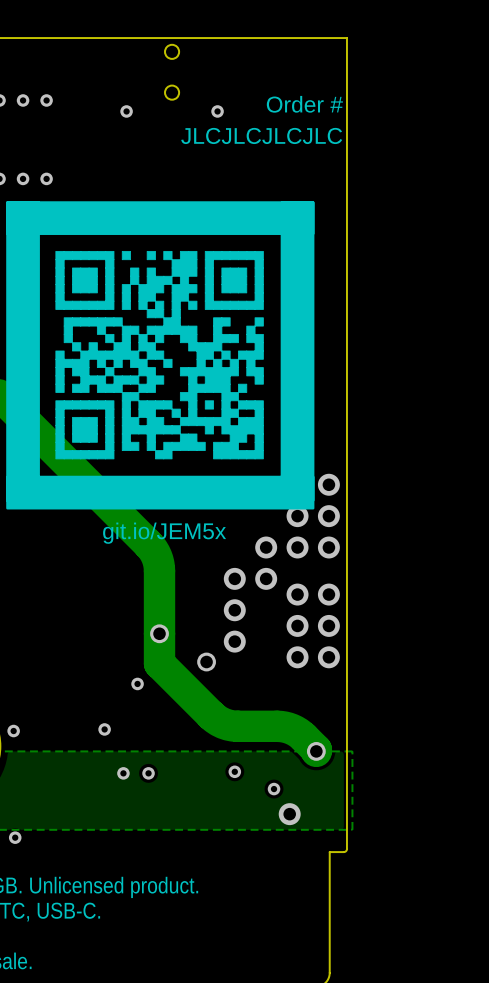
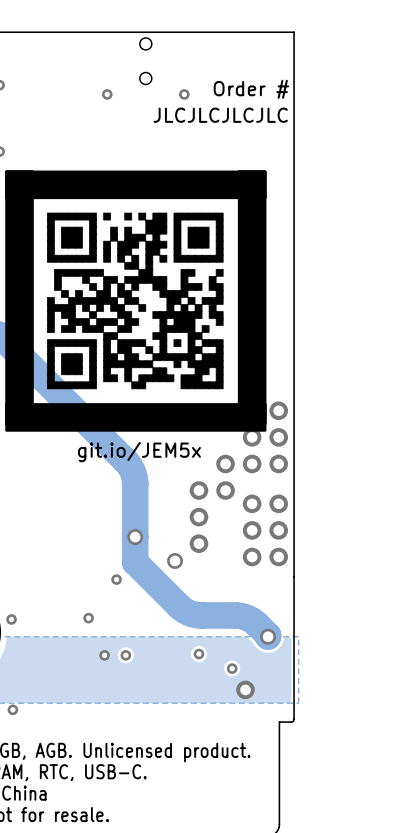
via: (23, 100) -> none
via: (46, 100) -> none
via: (23, 178) -> none
via: (46, 178) -> none

